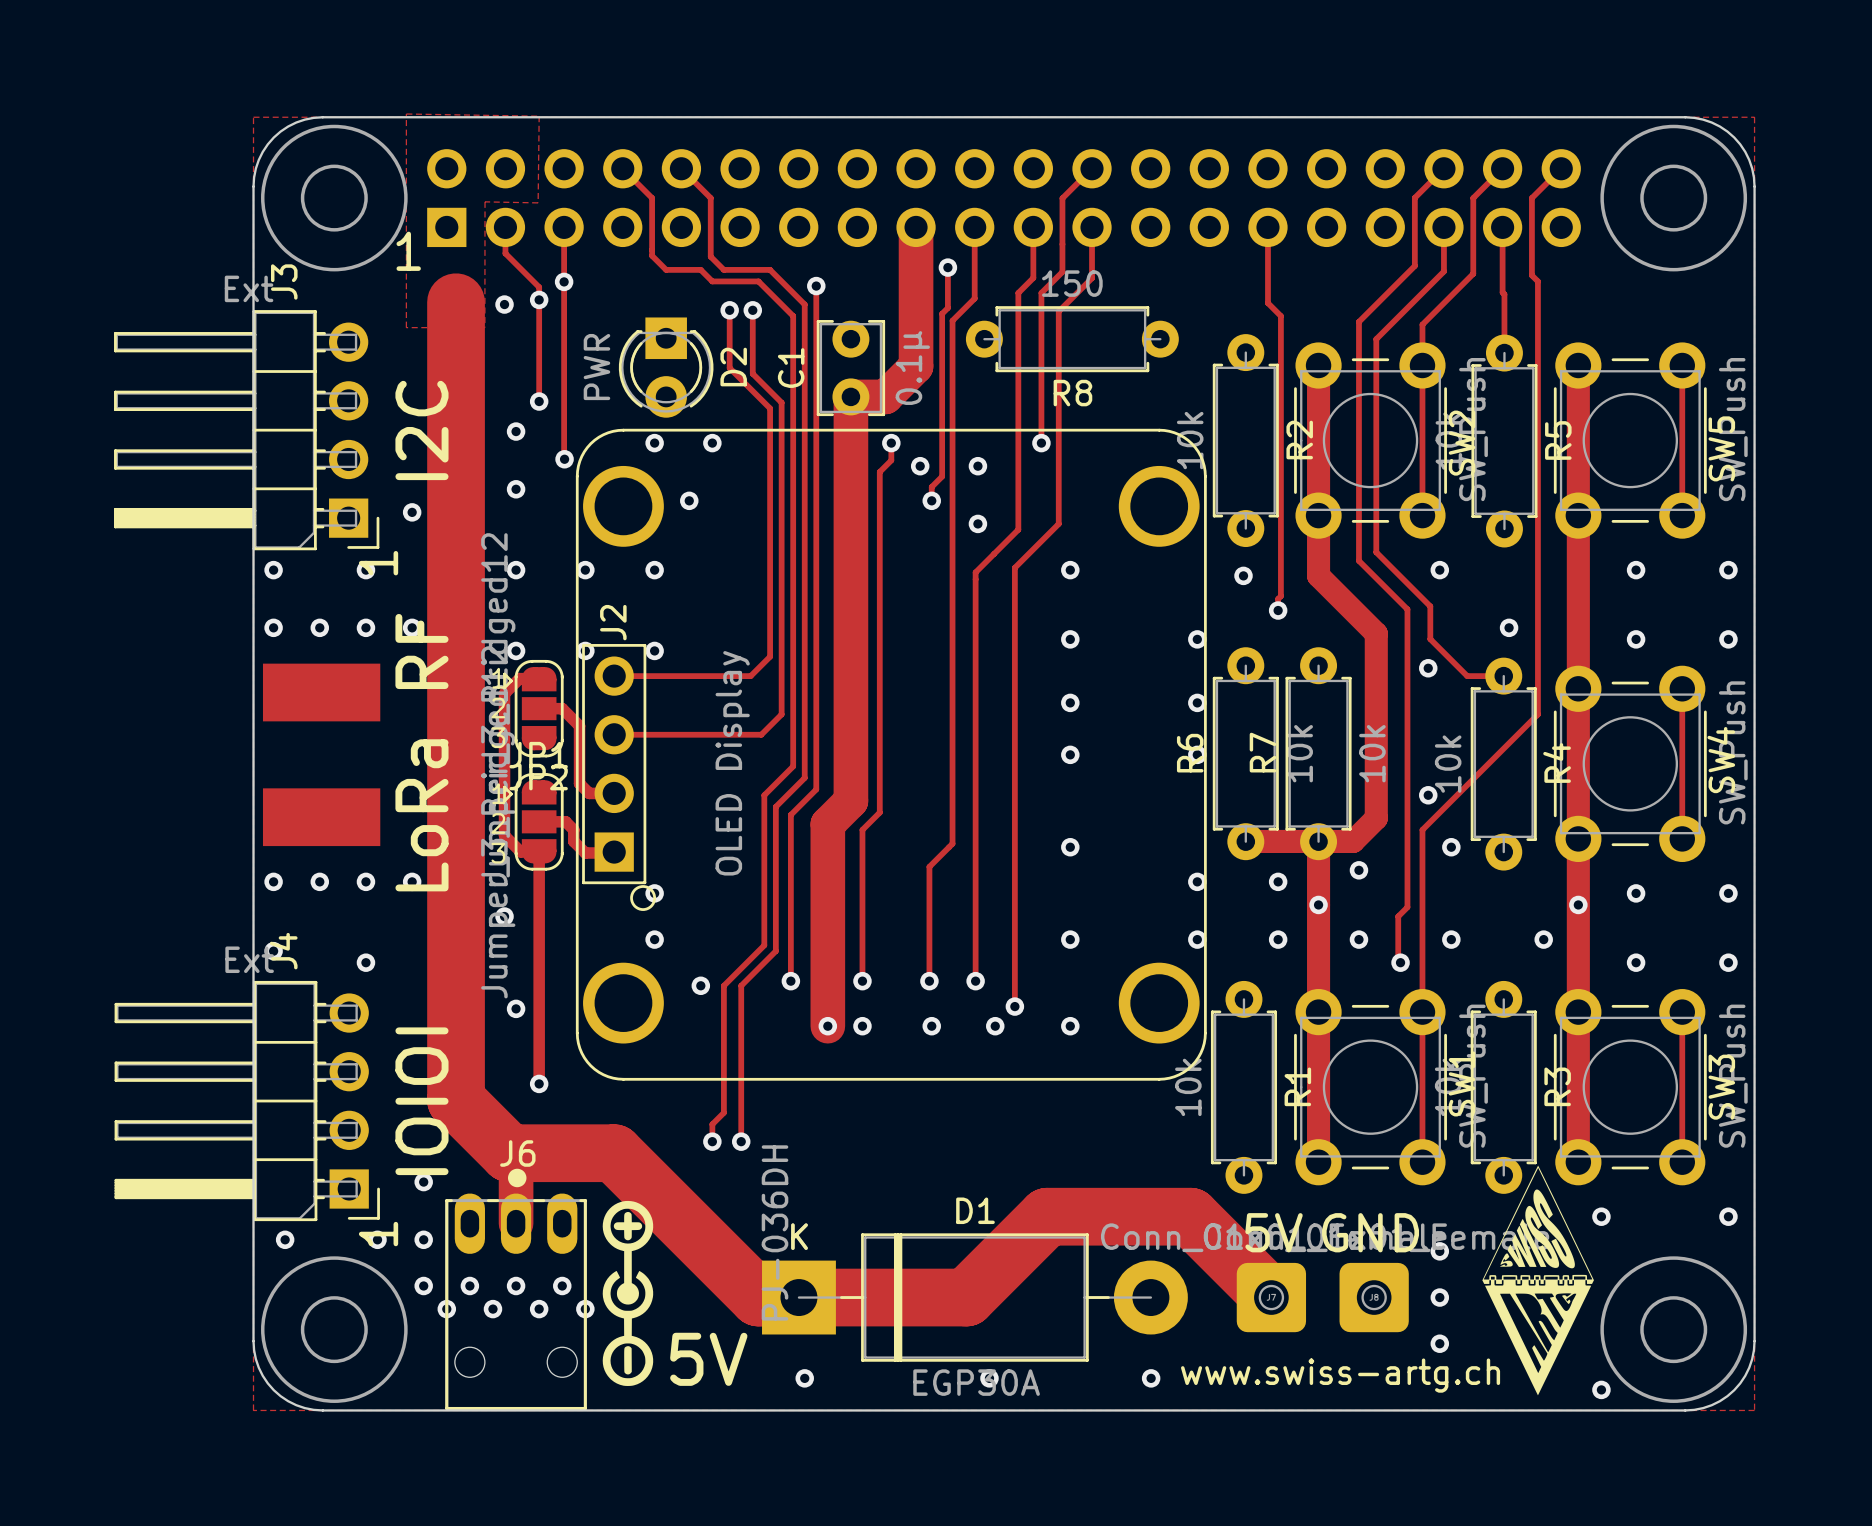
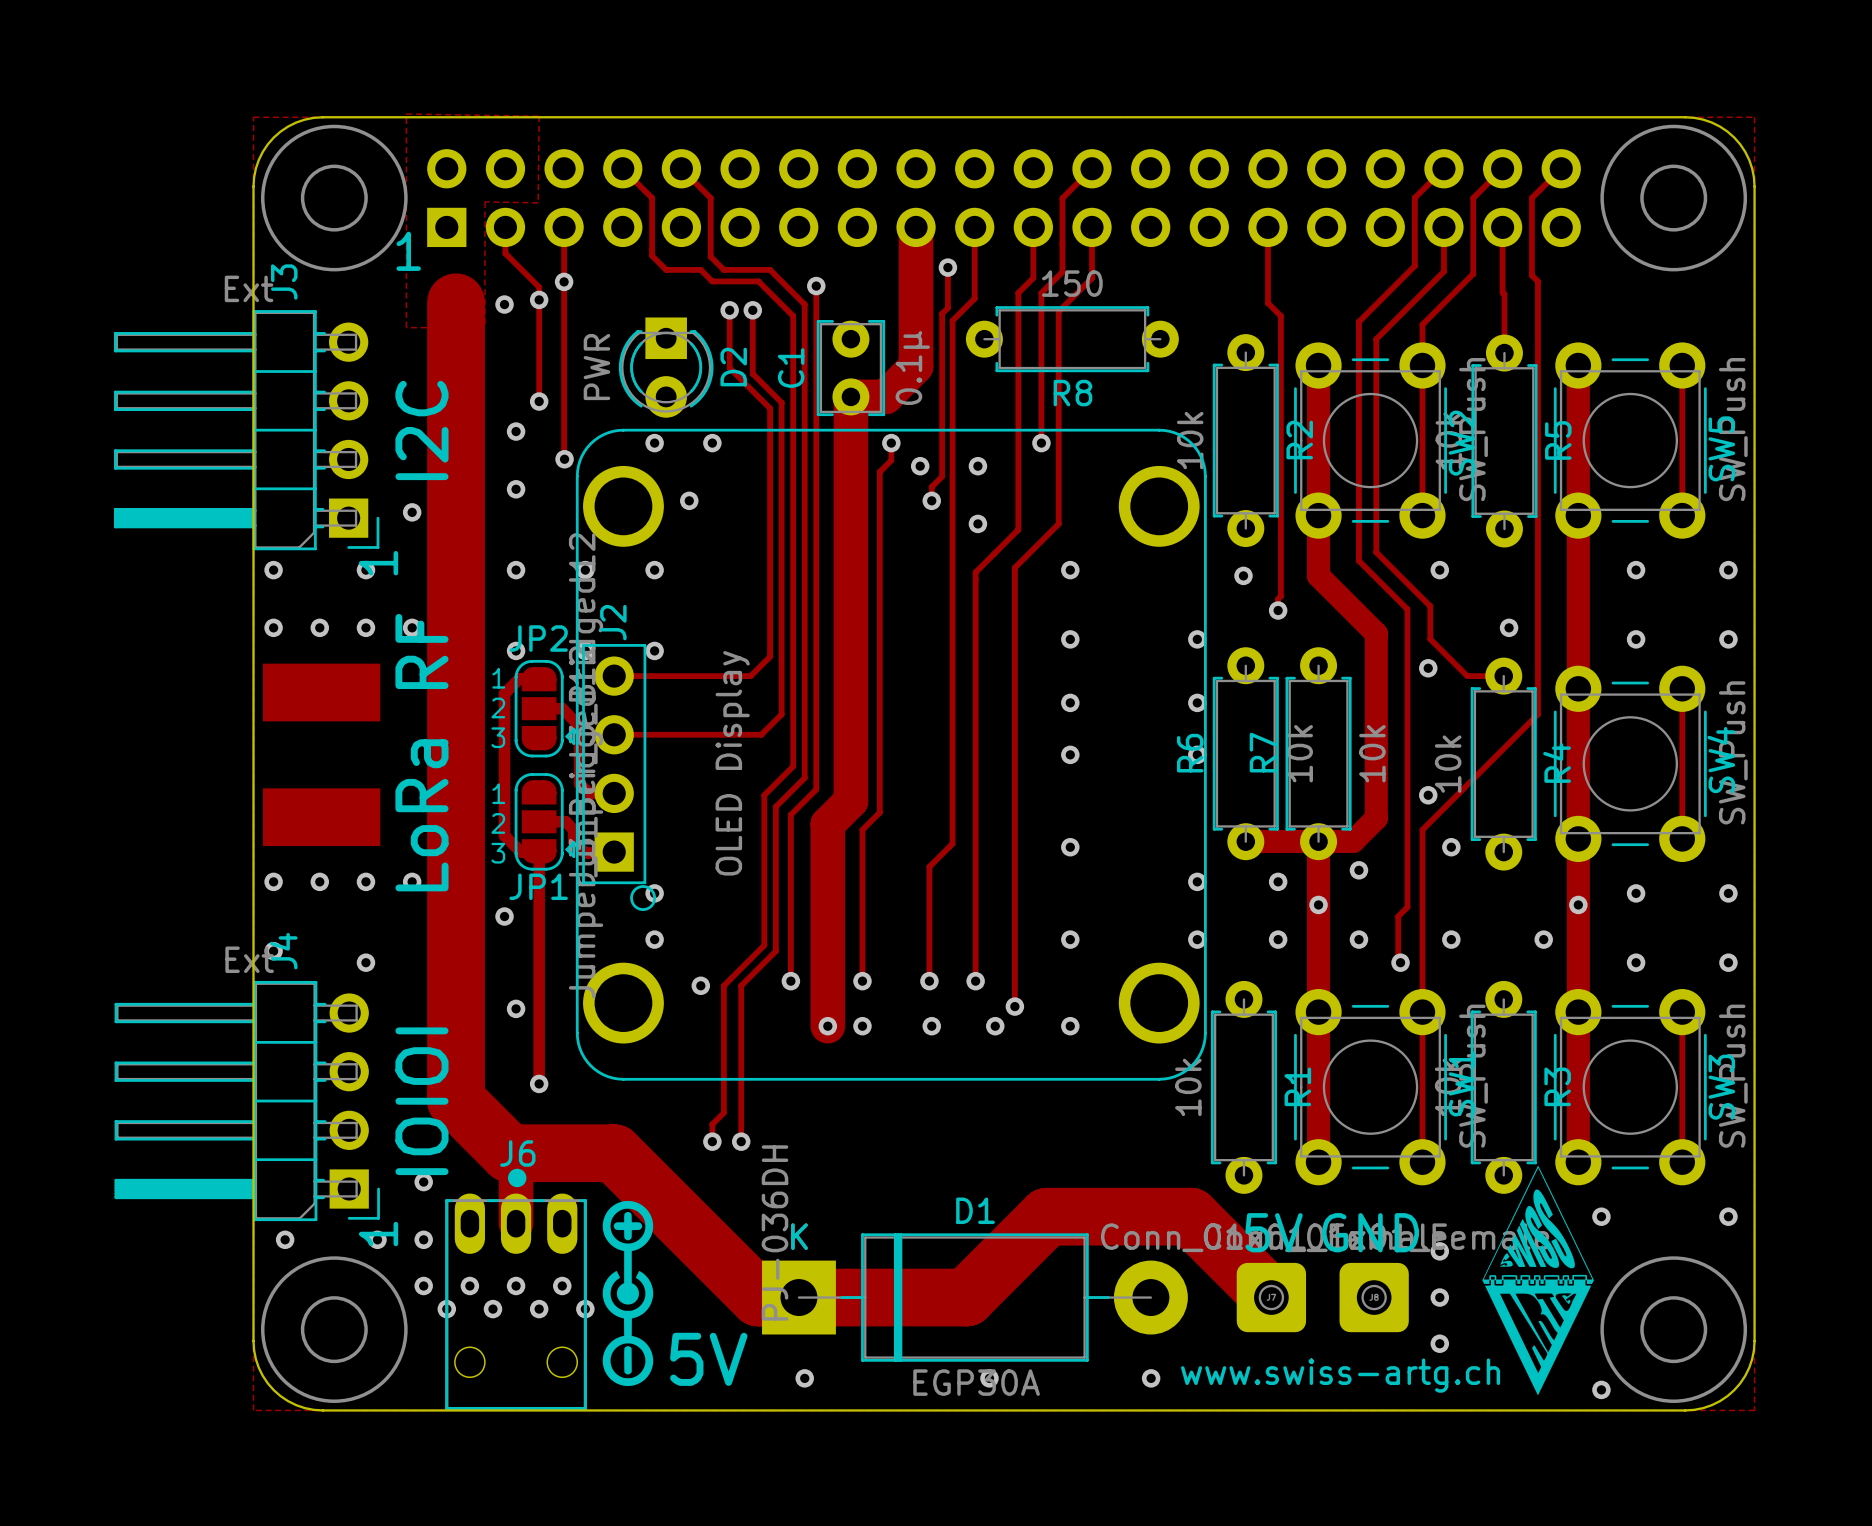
JP2 rotation: 0° (533, 708) -> 180° (544, 708)
JP1 rotation: 0° (533, 821) -> 180° (544, 821)

